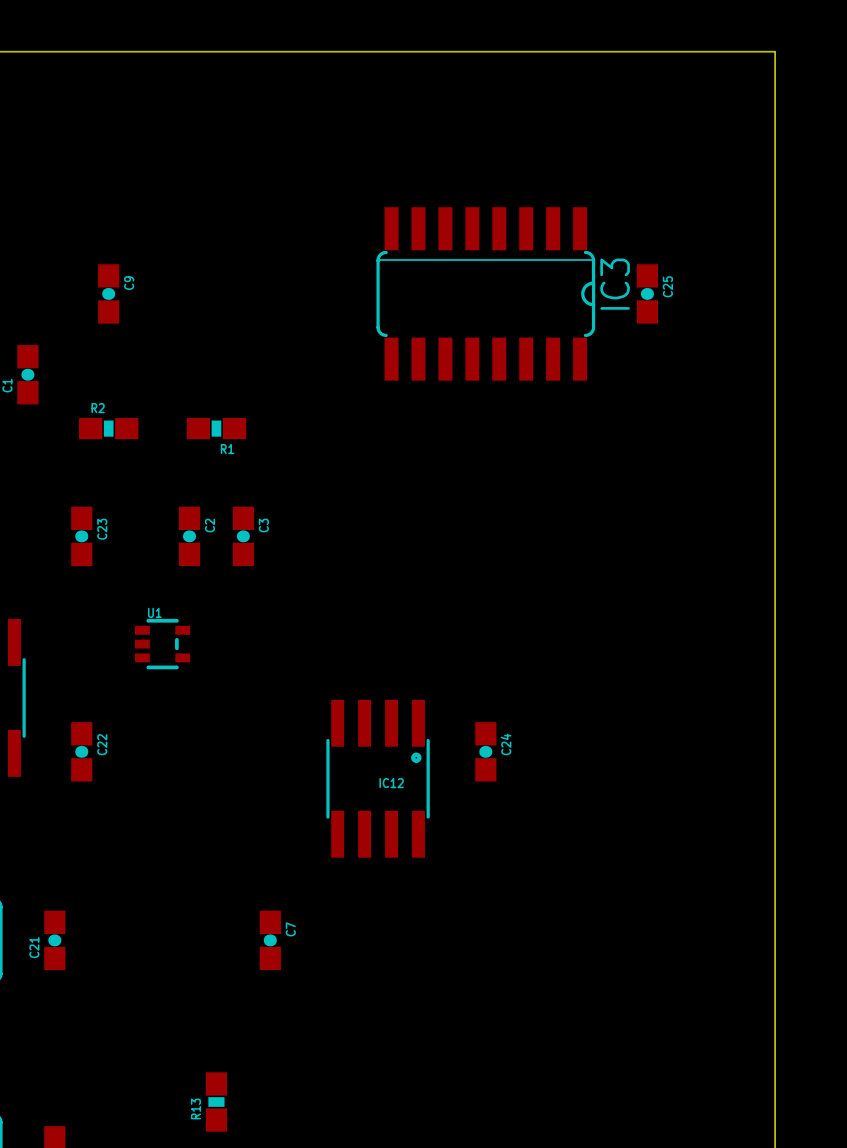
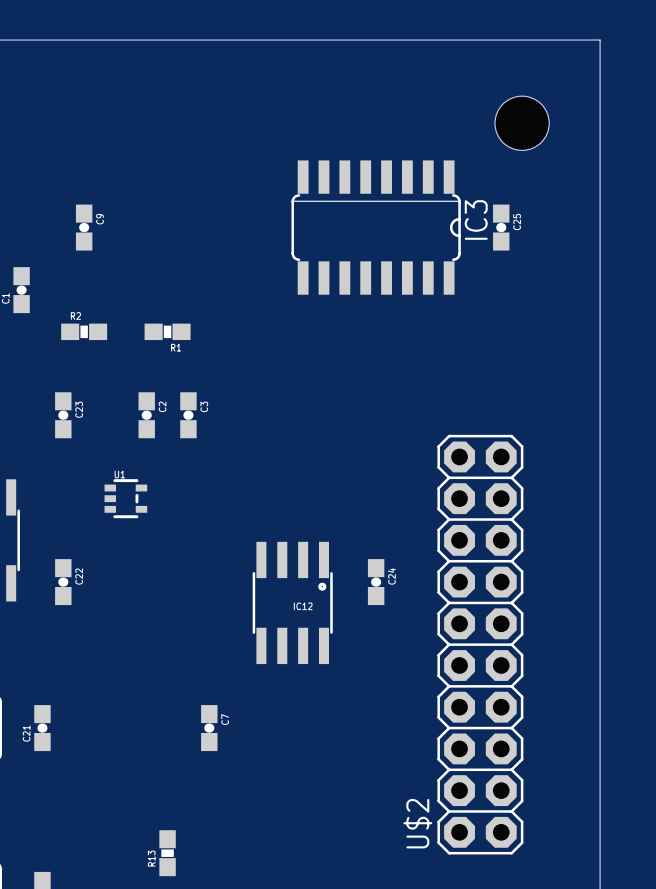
part: none -> (522, 123)
U$2: none -> (480, 644)

